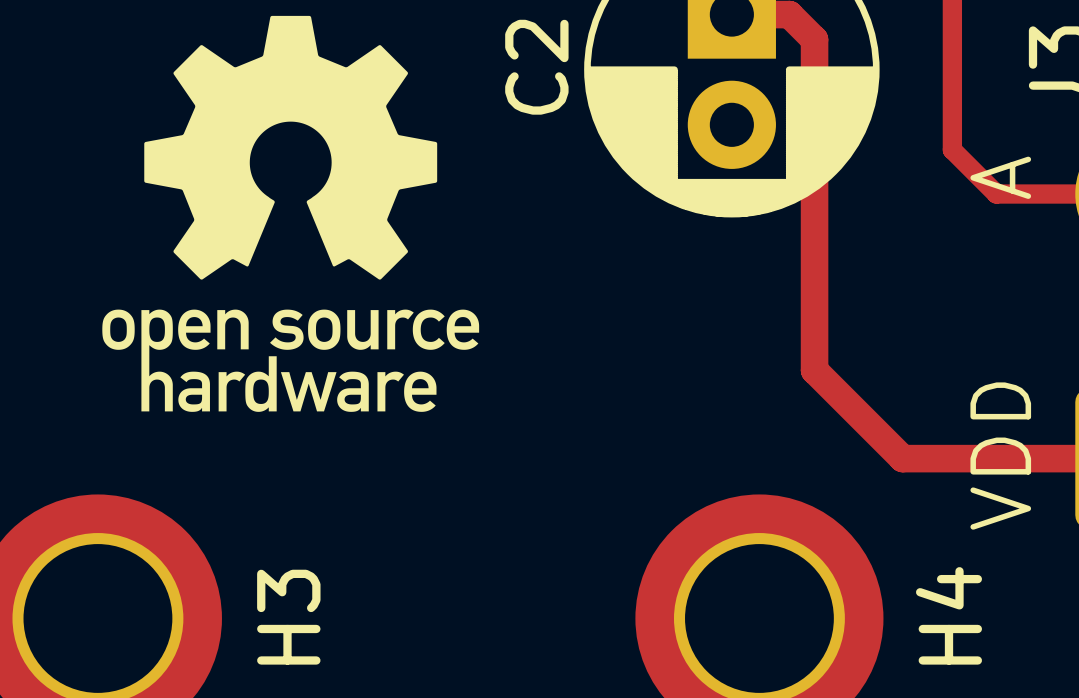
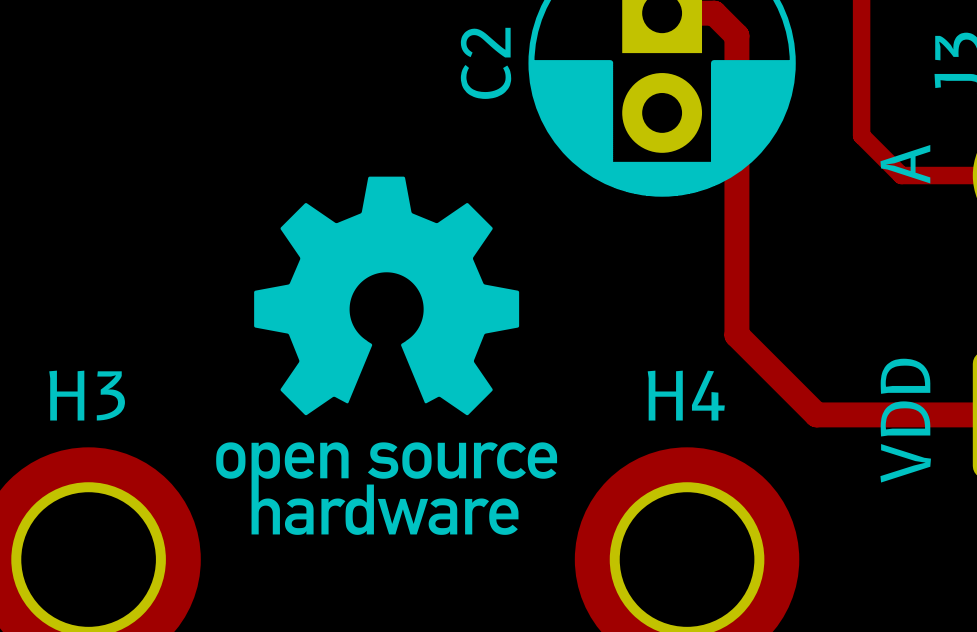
drawing position: (290, 147) -> (386, 295)
drawing: [102, 309, 246, 412] -> none
drawing: [308, 309, 480, 412] -> none
drawing position: (232, 329) -> (334, 460)
drawing position: (286, 329) -> (383, 460)
drawing position: (362, 329) -> (451, 460)
drawing position: (428, 329) -> (511, 460)
drawing position: (157, 360) -> (265, 488)
drawing position: (261, 384) -> (359, 509)
drawing position: (308, 391) -> (402, 516)
drawing: none -> [216, 442, 346, 535]
drawing: none -> [402, 442, 558, 535]
H4 name rotation: 0° (949, 615) -> 90° clockwise (686, 395)
H4 name position: H4 (949, 615) -> H4 (686, 395)
H3 name rotation: 0° (288, 617) -> 90° clockwise (87, 395)
H3 name position: H3 (288, 617) -> H3 (87, 395)

